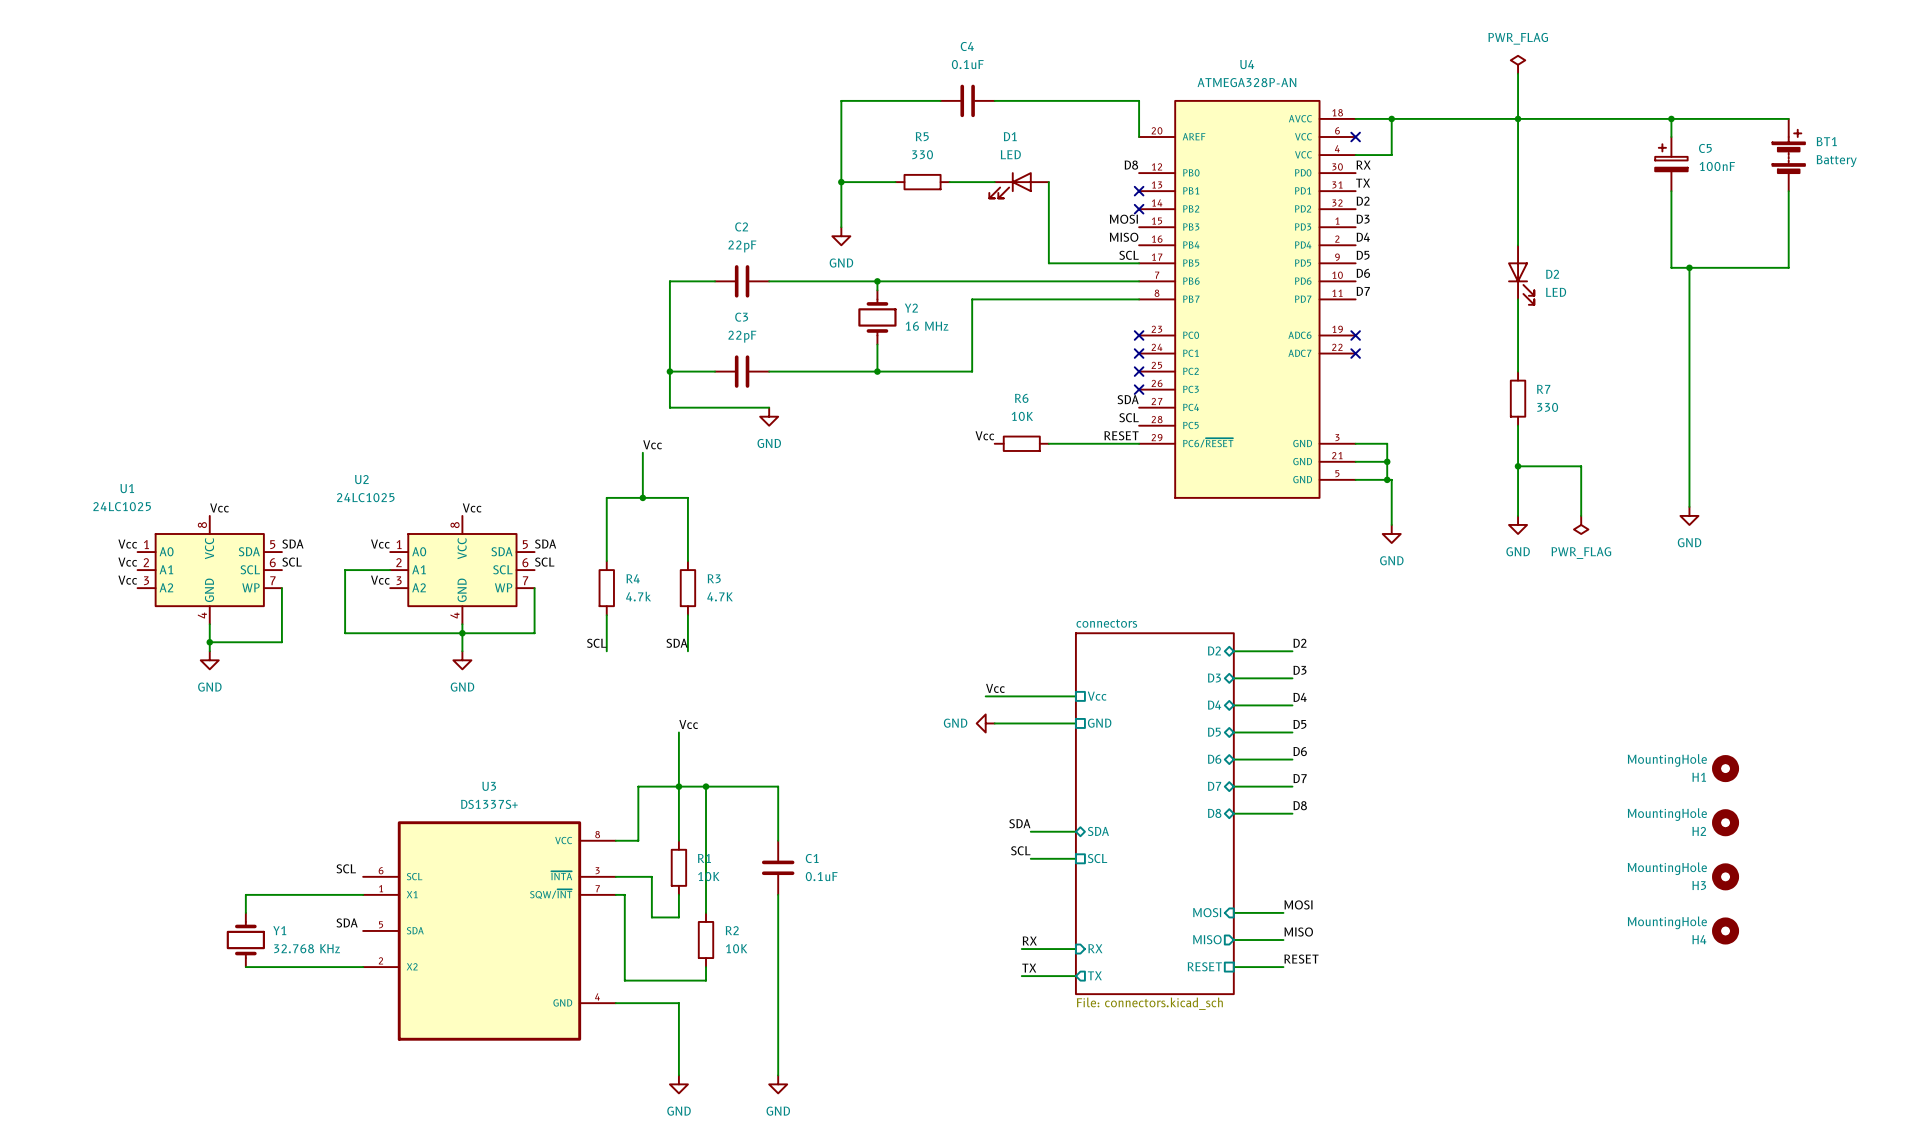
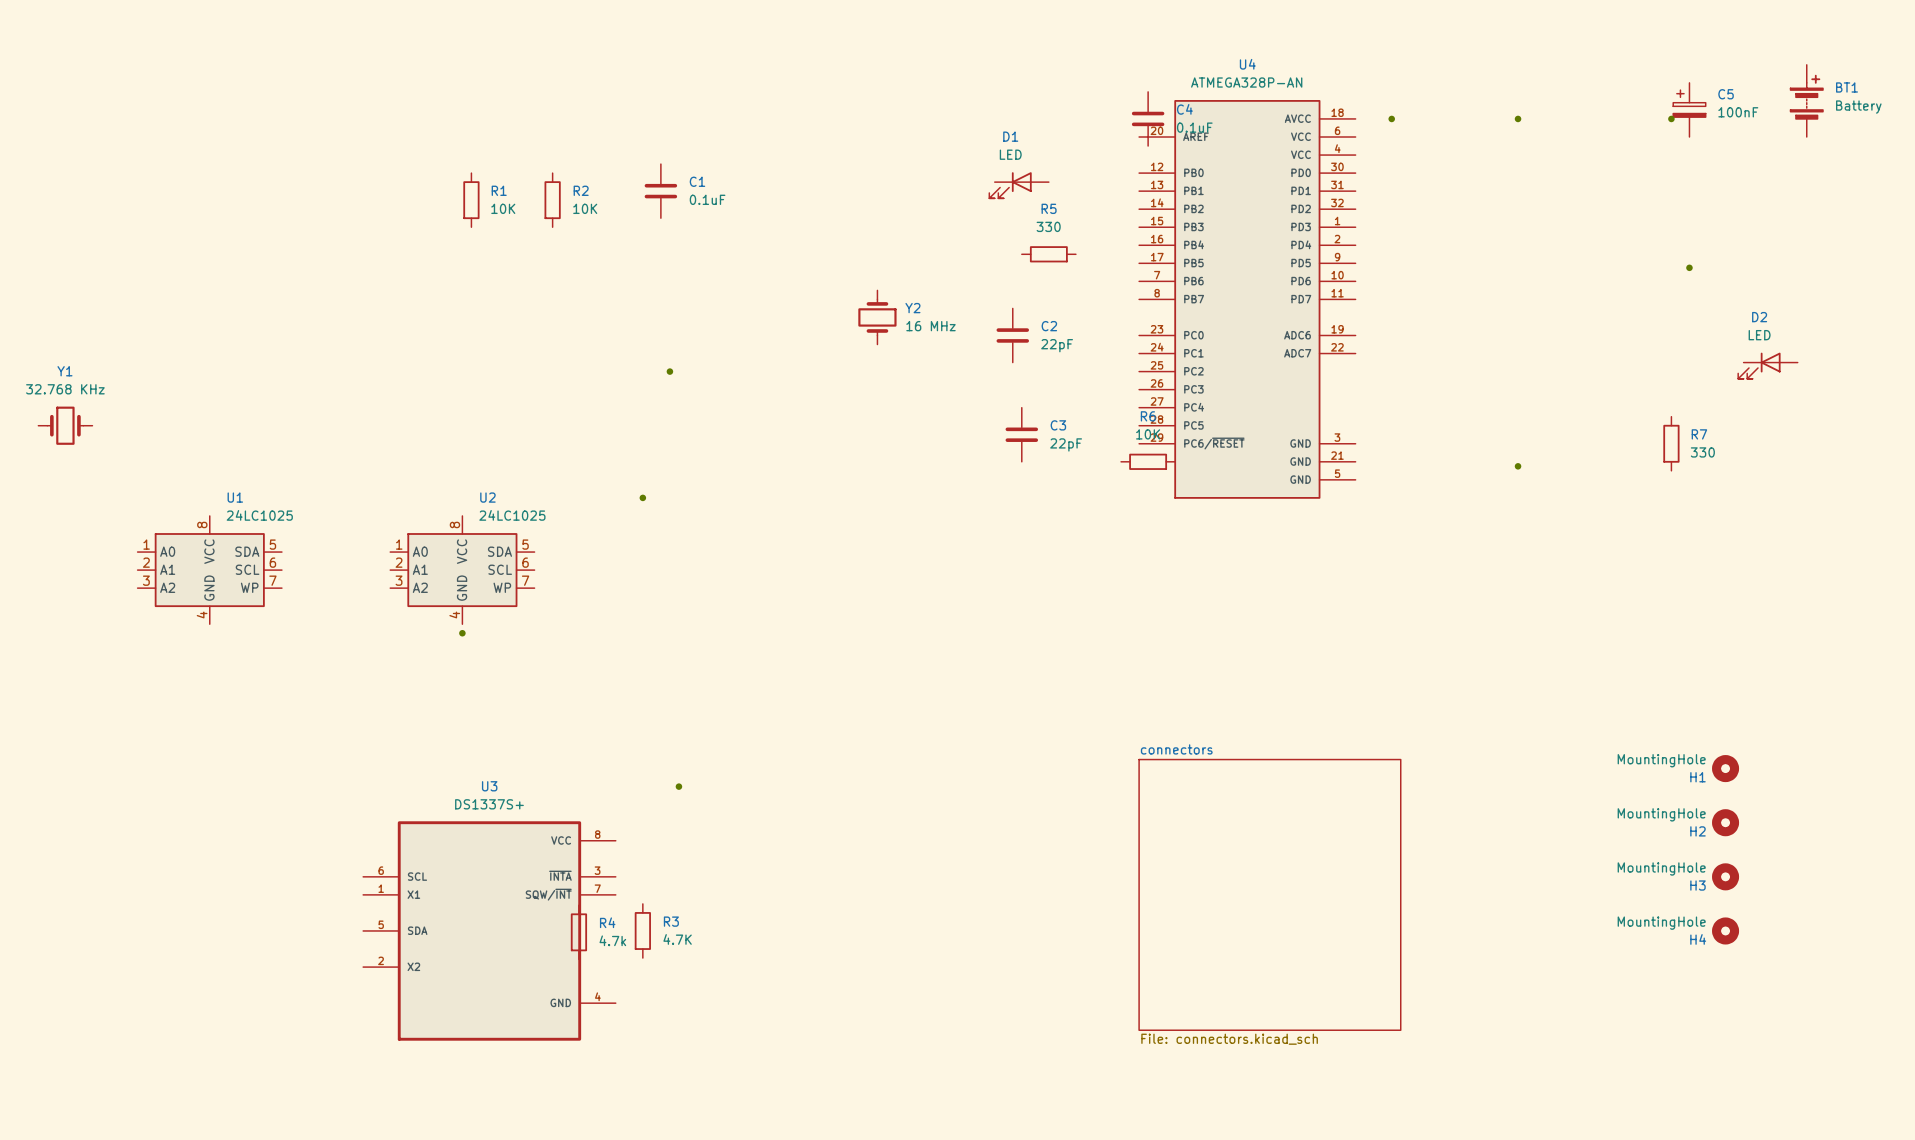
C4 name position: C4 (967, 46) -> C4 (1184, 109)
C4 value position: 0.1uF (967, 64) -> 0.1uF (1194, 127)
power symbol: PWR_FLAG (1518, 64) -> none
wire: (1518, 73) (1518, 245) -> none
wire: (940, 100) (841, 100) (841, 227) -> none
C4 rotation: 0° (967, 100) -> 90° clockwise (1148, 118)
C4 position: (967, 100) -> (1148, 118)
wire: (994, 100) (1139, 100) (1139, 137) -> none
wire: (1355, 118) (1788, 118) -> none
wire: (1391, 118) (1391, 155) (1355, 155) -> none
wire: (1671, 118) (1671, 137) -> none
no-connect mark: (1355, 137) -> none
BT1 position: (1788, 155) -> (1806, 100)
C5 position: (1671, 164) -> (1689, 109)
label: D8 (1131, 165) -> none
label: RX (1363, 165) -> none
wire: (841, 182) (895, 182) -> none
junction: (841, 182) -> none
R5 position: (922, 182) -> (1048, 254)
wire: (949, 182) (994, 182) -> none
wire: (1048, 182) (1048, 263) (1139, 263) -> none
label: TX (1363, 183) -> none
no-connect mark: (1139, 191) -> none
wire: (1671, 191) (1671, 267) (1788, 267) (1788, 191) -> none
label: D2 (1363, 201) -> none
no-connect mark: (1139, 209) -> none
label: MOSI (1123, 219) -> none
label: D3 (1363, 219) -> none
C2 name position: C2 (741, 226) -> C2 (1049, 326)
power symbol: GND (841, 236) -> none
label: MISO (1124, 237) -> none
label: D4 (1363, 237) -> none
label: SCL (1129, 255) -> none
label: D5 (1363, 255) -> none
wire: (1689, 267) (1689, 506) -> none
label: D6 (1363, 273) -> none
D2 name position: D2 (1552, 274) -> D2 (1759, 317)
D2 position: (1521, 275) -> (1767, 365)
wire: (715, 281) (669, 281) (669, 407) (769, 407) -> none
C2 rotation: 0° (742, 281) -> 90° clockwise (1012, 335)
C2 position: (742, 281) -> (1012, 335)
wire: (769, 281) (1139, 281) -> none
wire: (877, 281) (877, 290) -> none
junction: (877, 281) -> none
D2 rotation: 0° (1521, 283) -> 90° clockwise (1759, 365)
label: D7 (1363, 291) -> none
D2 value position: LED (1556, 292) -> LED (1759, 335)
wire: (1139, 299) (972, 299) (972, 371) (769, 371) -> none
wire: (1518, 299) (1518, 371) -> none
C3 name position: C3 (741, 317) -> C3 (1058, 425)
no-connect mark: (1139, 335) -> none
no-connect mark: (1355, 335) -> none
wire: (877, 344) (877, 371) -> none
no-connect mark: (1139, 353) -> none
no-connect mark: (1355, 353) -> none
wire: (669, 371) (715, 371) -> none
C3 rotation: 0° (742, 371) -> 90° clockwise (1021, 434)
C3 position: (742, 371) -> (1021, 434)
junction: (877, 371) -> none
no-connect mark: (1139, 371) -> none
no-connect mark: (1139, 389) -> none
R7 position: (1518, 398) -> (1671, 443)
label: SDA (1128, 399) -> none
power symbol: GND (769, 416) -> none
label: SCL (1129, 417) -> none
wire: (1518, 425) (1518, 515) -> none
label: Vcc (984, 435) -> none
label: RESET (1121, 435) -> none
R6 position: (1021, 443) -> (1148, 461)
wire: (1048, 443) (1139, 443) -> none
wire: (1355, 443) (1387, 443) (1387, 479) -> none
label: Vcc (652, 444) -> none
wire: (642, 452) (642, 497) -> none
wire: (1355, 461) (1387, 461) -> none
junction: (1387, 461) -> none
wire: (1518, 466) (1581, 466) (1581, 515) -> none
U2 name position: U2 (361, 479) -> U2 (487, 497)
wire: (1355, 479) (1391, 479) (1391, 524) -> none
junction: (1387, 479) -> none
U1 name position: U1 (127, 488) -> U1 (235, 497)
U2 value position: 24LC1025 (365, 497) -> 24LC1025 (512, 515)
U1 value position: 24LC1025 (122, 506) -> 24LC1025 (259, 515)
label: Vcc (219, 507) -> none
label: Vcc (472, 507) -> none
power symbol: GND (1689, 515) -> none
power symbol: GND (1518, 524) -> none
power symbol: PWR_FLAG (1581, 524) -> none
power symbol: GND (1391, 533) -> none
label: Vcc (127, 544) -> none
label: SDA (292, 544) -> none
label: Vcc (380, 544) -> none
label: SDA (545, 544) -> none
wire: (606, 561) (606, 497) (687, 497) (687, 561) -> none
label: Vcc (127, 562) -> none
label: SCL (292, 562) -> none
label: SCL (544, 562) -> none
wire: (390, 570) (345, 570) (345, 633) (534, 633) (534, 588) -> none
label: Vcc (127, 580) -> none
label: Vcc (380, 580) -> none
wire: (281, 588) (281, 642) (209, 642) -> none
R4 position: (606, 588) -> (578, 932)
R3 position: (687, 588) -> (642, 930)
wire: (606, 615) (606, 651) -> none
wire: (687, 615) (687, 651) -> none
wire: (209, 624) (209, 651) -> none
wire: (462, 624) (462, 651) -> none
junction: (209, 642) -> none
label: SCL (596, 643) -> none
label: SDA (677, 643) -> none
label: D2 (1299, 643) -> none
sheet pin: D2 (1214, 650) -> none
wire: (1233, 651) (1292, 651) -> none
power symbol: GND (209, 660) -> none
power symbol: GND (462, 660) -> none
label: D3 (1299, 670) -> none
sheet pin: D3 (1214, 678) -> none
wire: (1233, 678) (1292, 678) -> none
label: Vcc (995, 688) -> none
wire: (985, 696) (1075, 696) -> none
sheet pin: Vcc (1097, 696) -> none
label: D4 (1300, 697) -> none
sheet pin: D4 (1214, 705) -> none
wire: (1233, 705) (1292, 705) -> none
power symbol: GND (985, 723) -> none
wire: (994, 723) (1075, 723) -> none
sheet pin: GND (1099, 723) -> none
label: Vcc (688, 724) -> none
label: D5 (1299, 724) -> none
wire: (678, 732) (678, 840) -> none
sheet pin: D5 (1214, 732) -> none
wire: (1233, 732) (1292, 732) -> none
label: D6 (1300, 751) -> none
sheet pin: D6 (1214, 759) -> none
label: D7 (1300, 778) -> none
wire: (706, 786) (706, 912) -> none
junction: (706, 786) -> none
sheet pin: D7 (1214, 786) -> none
wire: (1233, 786) (1292, 786) -> none
label: D8 (1300, 805) -> none
sheet connectors: File: connectors.kicad_sch (1154, 813) -> none
sheet pin: D8 (1214, 813) -> none
wire: (1233, 813) (1292, 813) -> none
label: SDA (1019, 823) -> none
wire: (1030, 831) (1075, 831) -> none
sheet pin: SDA (1098, 831) -> none
wire: (615, 840) (638, 840) (638, 786) (778, 786) (778, 840) -> none
label: SCL (1020, 850) -> none
wire: (1030, 858) (1075, 858) -> none
sheet pin: SCL (1097, 858) -> none
R1 position: (678, 867) -> (471, 200)
C1 position: (778, 867) -> (660, 191)
label: SCL (346, 868) -> none
wire: (615, 876) (651, 876) (651, 917) (678, 917) (678, 894) -> none
wire: (363, 894) (245, 894) (245, 912) -> none
wire: (615, 894) (624, 894) (624, 980) (706, 980) (706, 967) -> none
wire: (778, 894) (778, 1075) -> none
sheet connectors: none -> File: connectors.kicad_sch (1269, 894)
label: MOSI (1298, 904) -> none
sheet pin: MOSI (1207, 912) -> none
wire: (1233, 912) (1283, 912) -> none
label: SDA (347, 922) -> none
Y1 name position: Y1 (279, 930) -> Y1 (64, 371)
label: MISO (1298, 932) -> none
sheet pin: MISO (1207, 939) -> none
Y1 rotation: 0° (245, 940) -> 90° clockwise (65, 425)
Y1 position: (245, 940) -> (65, 425)
R2 position: (706, 940) -> (552, 200)
label: RX (1029, 940) -> none
wire: (1233, 940) (1283, 940) -> none
Y1 value position: 32.768 KHz (307, 948) -> 32.768 KHz (65, 389)
sheet pin: RX (1095, 948) -> none
wire: (1021, 949) (1075, 949) -> none
label: RESET (1301, 959) -> none
sheet pin: RESET (1204, 966) -> none
wire: (245, 967) (363, 967) -> none
wire: (1233, 967) (1283, 967) -> none
label: TX (1029, 968) -> none
sheet pin: TX (1094, 975) -> none
wire: (1021, 976) (1075, 976) -> none
wire: (615, 1003) (678, 1003) (678, 1075) -> none
power symbol: GND (678, 1084) -> none
power symbol: GND (778, 1084) -> none

